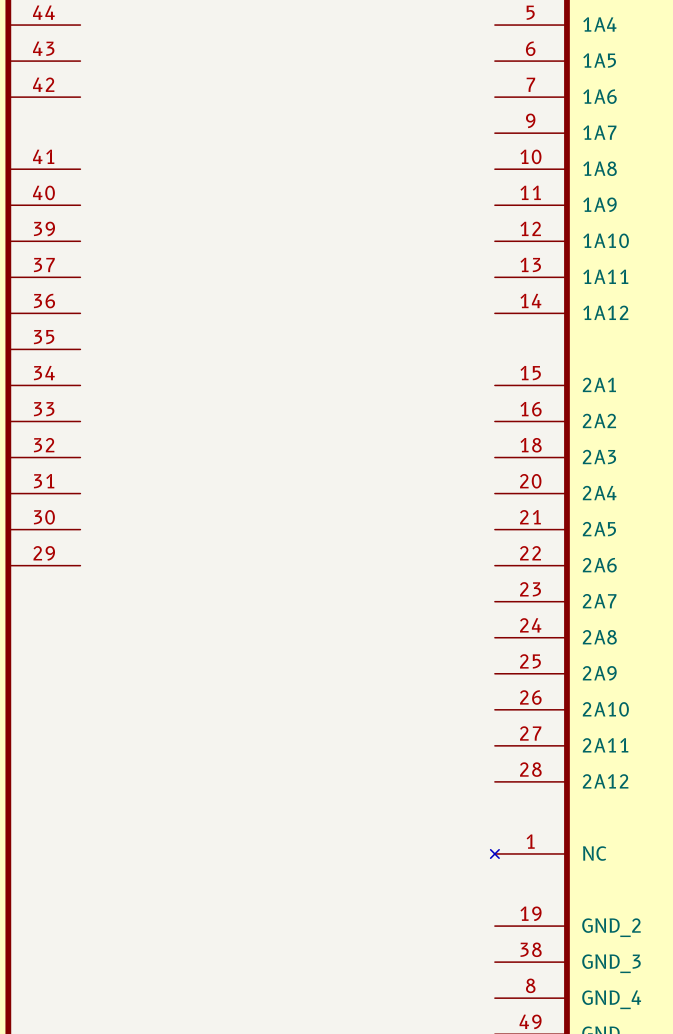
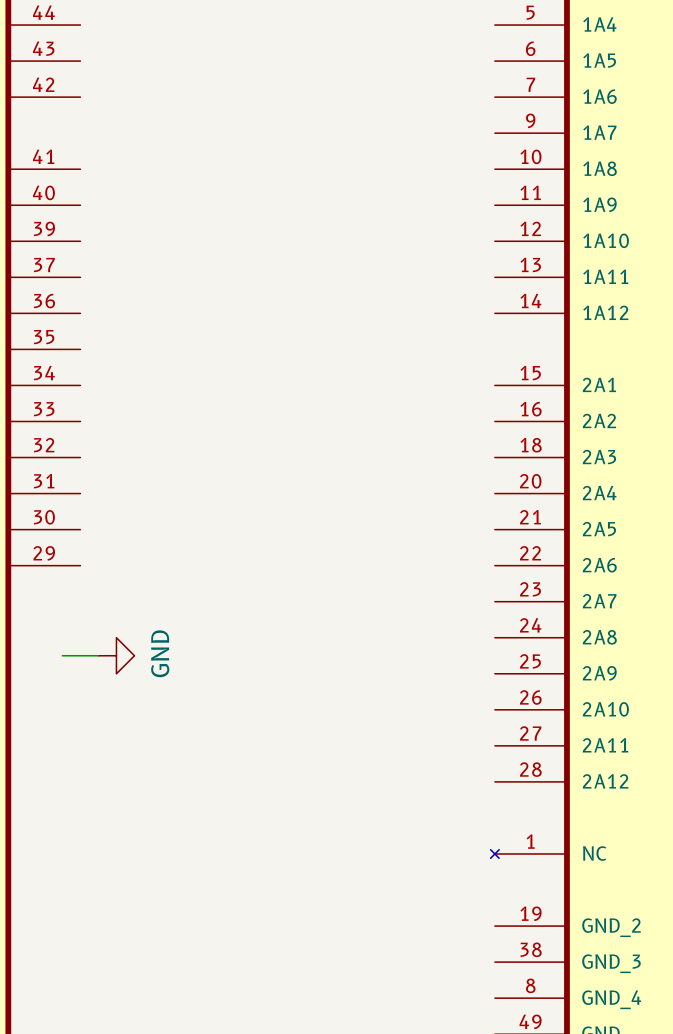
wire: none -> (62, 655) (98, 655)
power symbol: none -> GND (116, 655)

